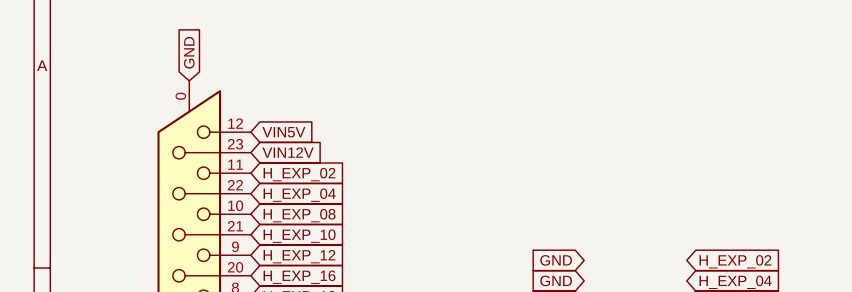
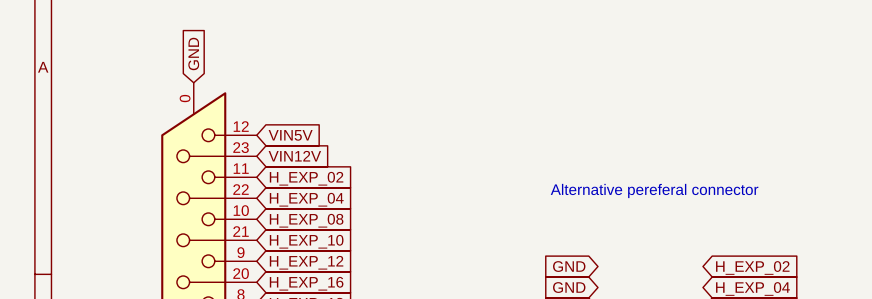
text: none -> Alternative pereferal connector (654, 190)

